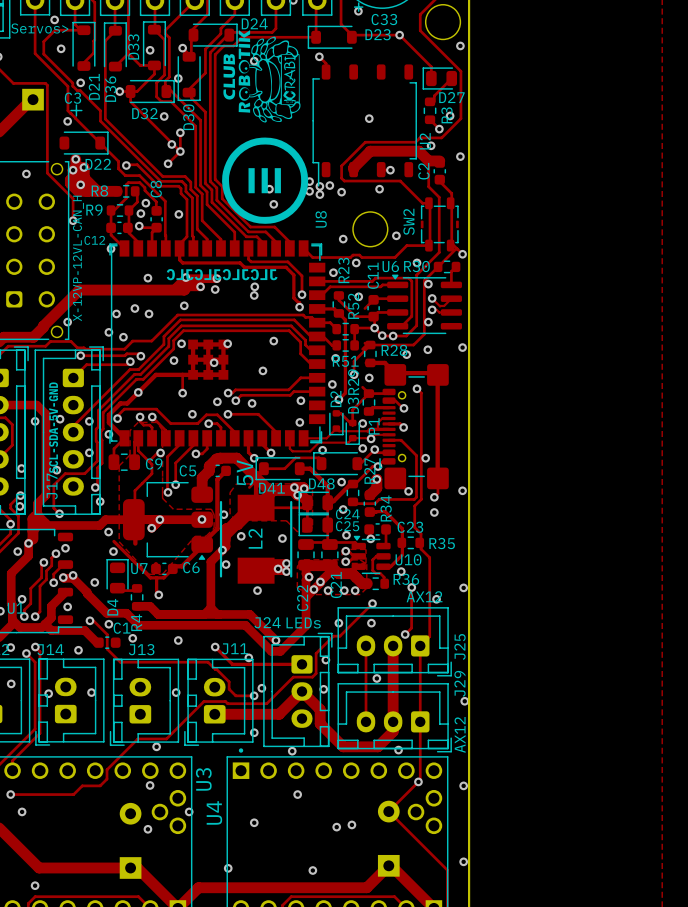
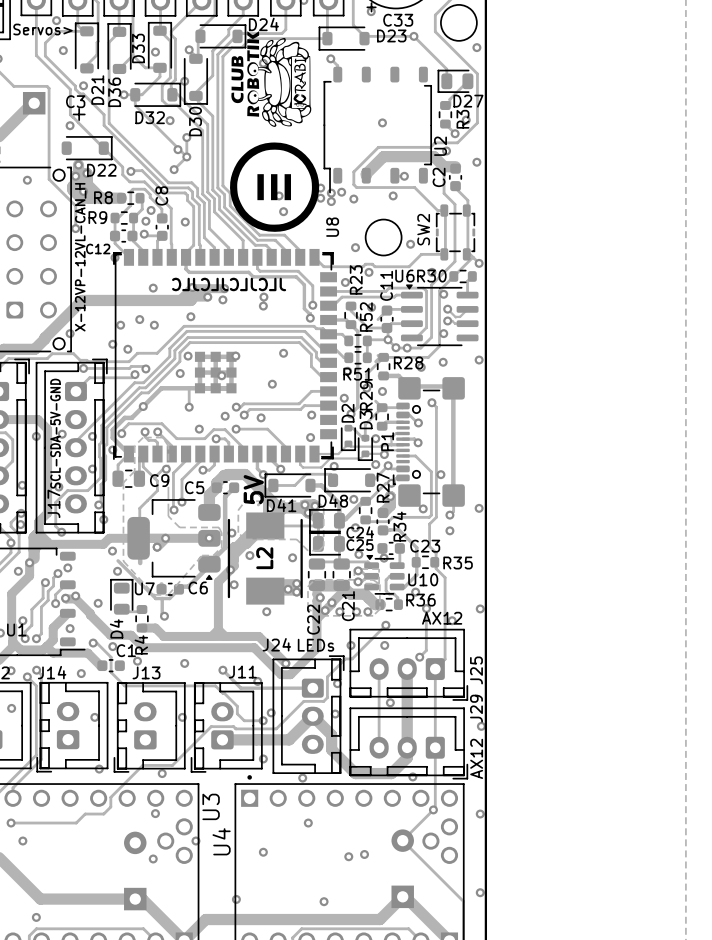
via: (48, 693) -> none
via: none -> (99, 769)

